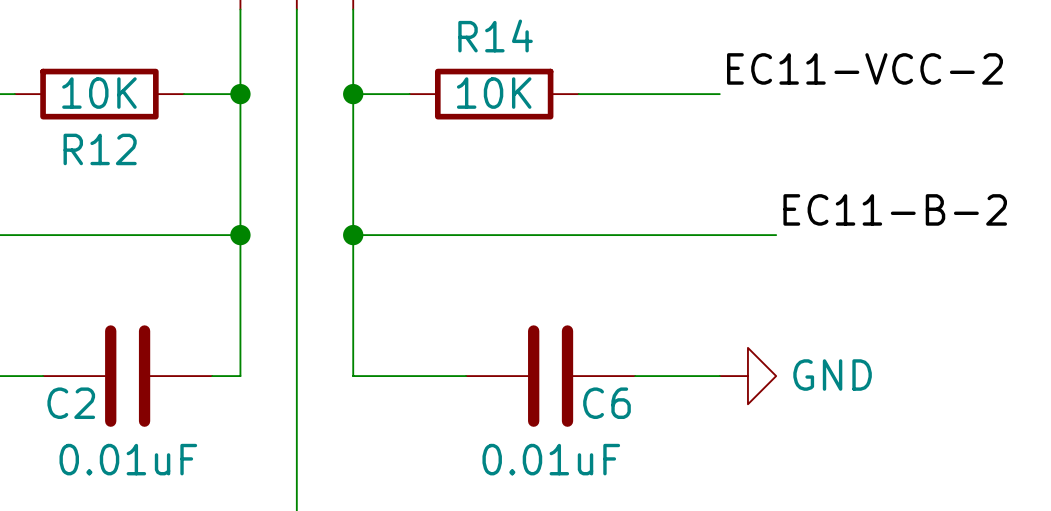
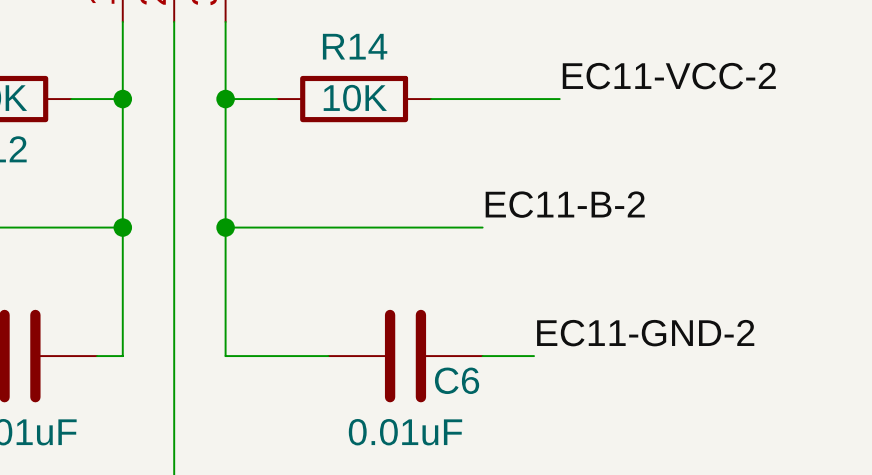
label position: EC11-B-2 (895, 209) -> EC11-B-2 (565, 204)
wire: (635, 235) (776, 235) -> none
label: none -> EC11-GND-2 (645, 333)
wire: (691, 376) (719, 376) -> none
power symbol: GND (747, 376) -> none

